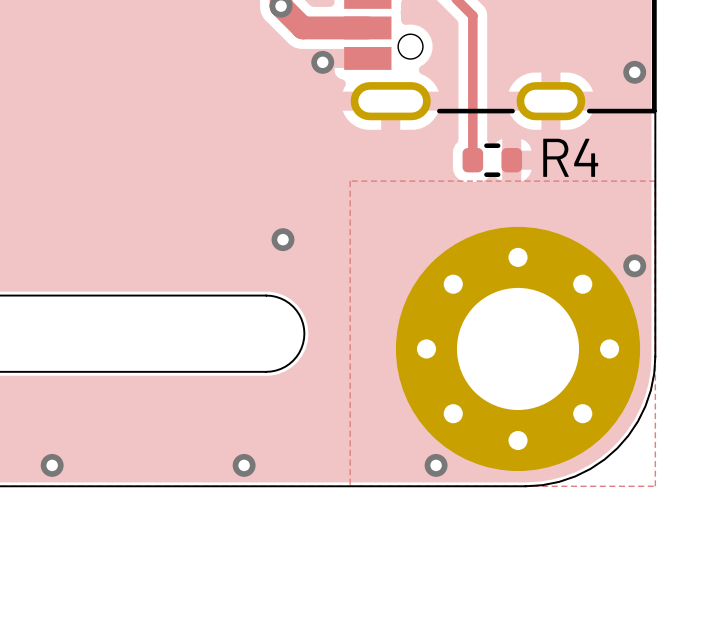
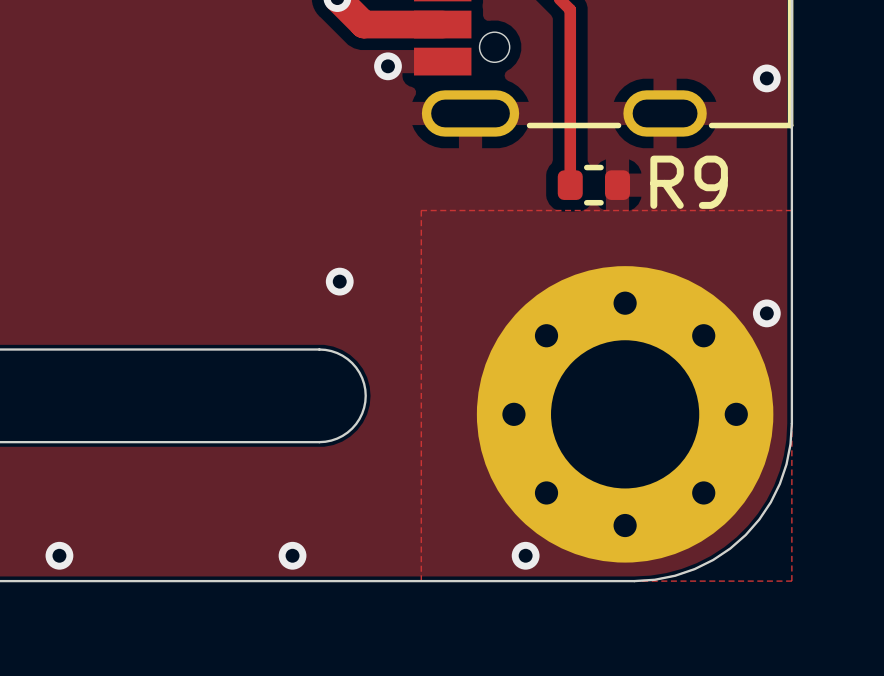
R4 name: R4 (570, 157) -> R9 (689, 182)

